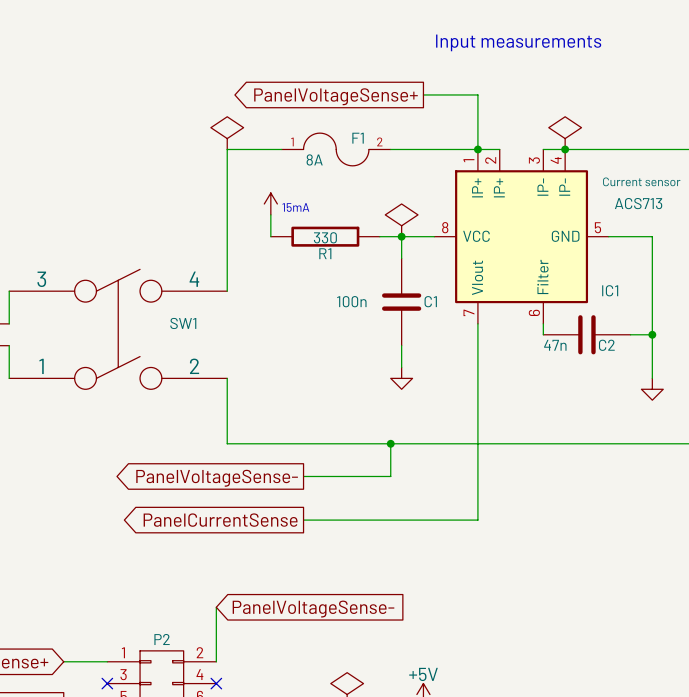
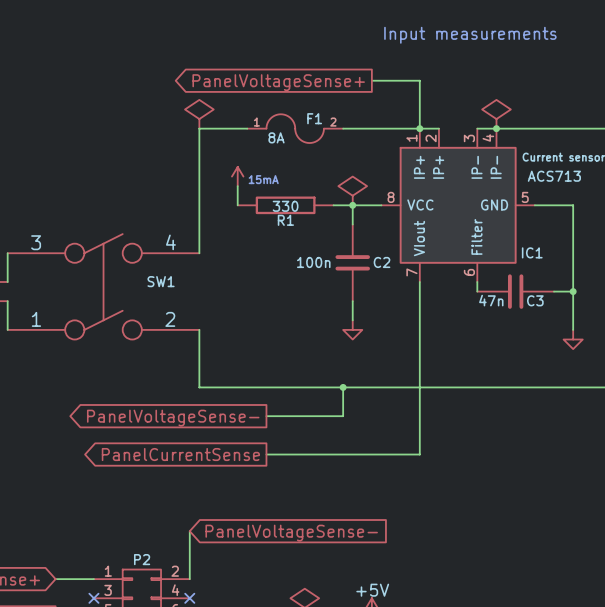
C1 name: C1 (430, 301) -> C2 (382, 262)
C2 name: C2 (606, 345) -> C3 (535, 300)

